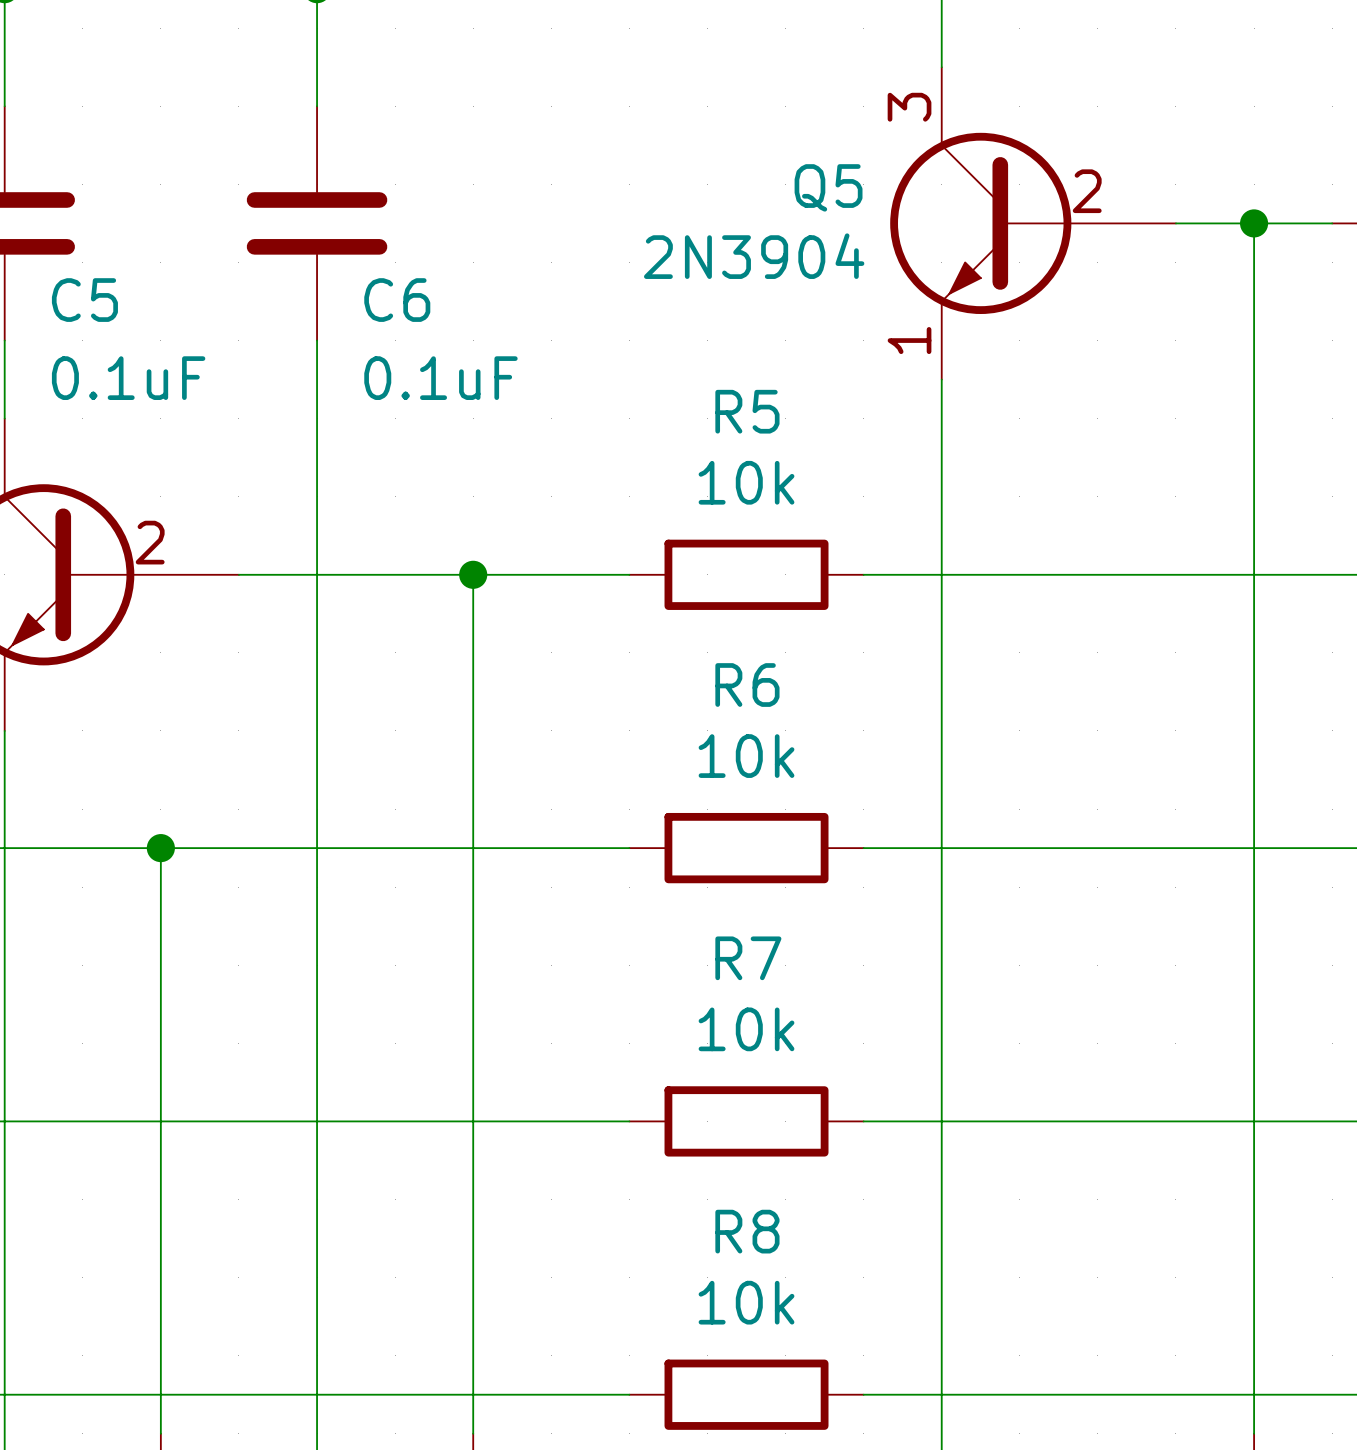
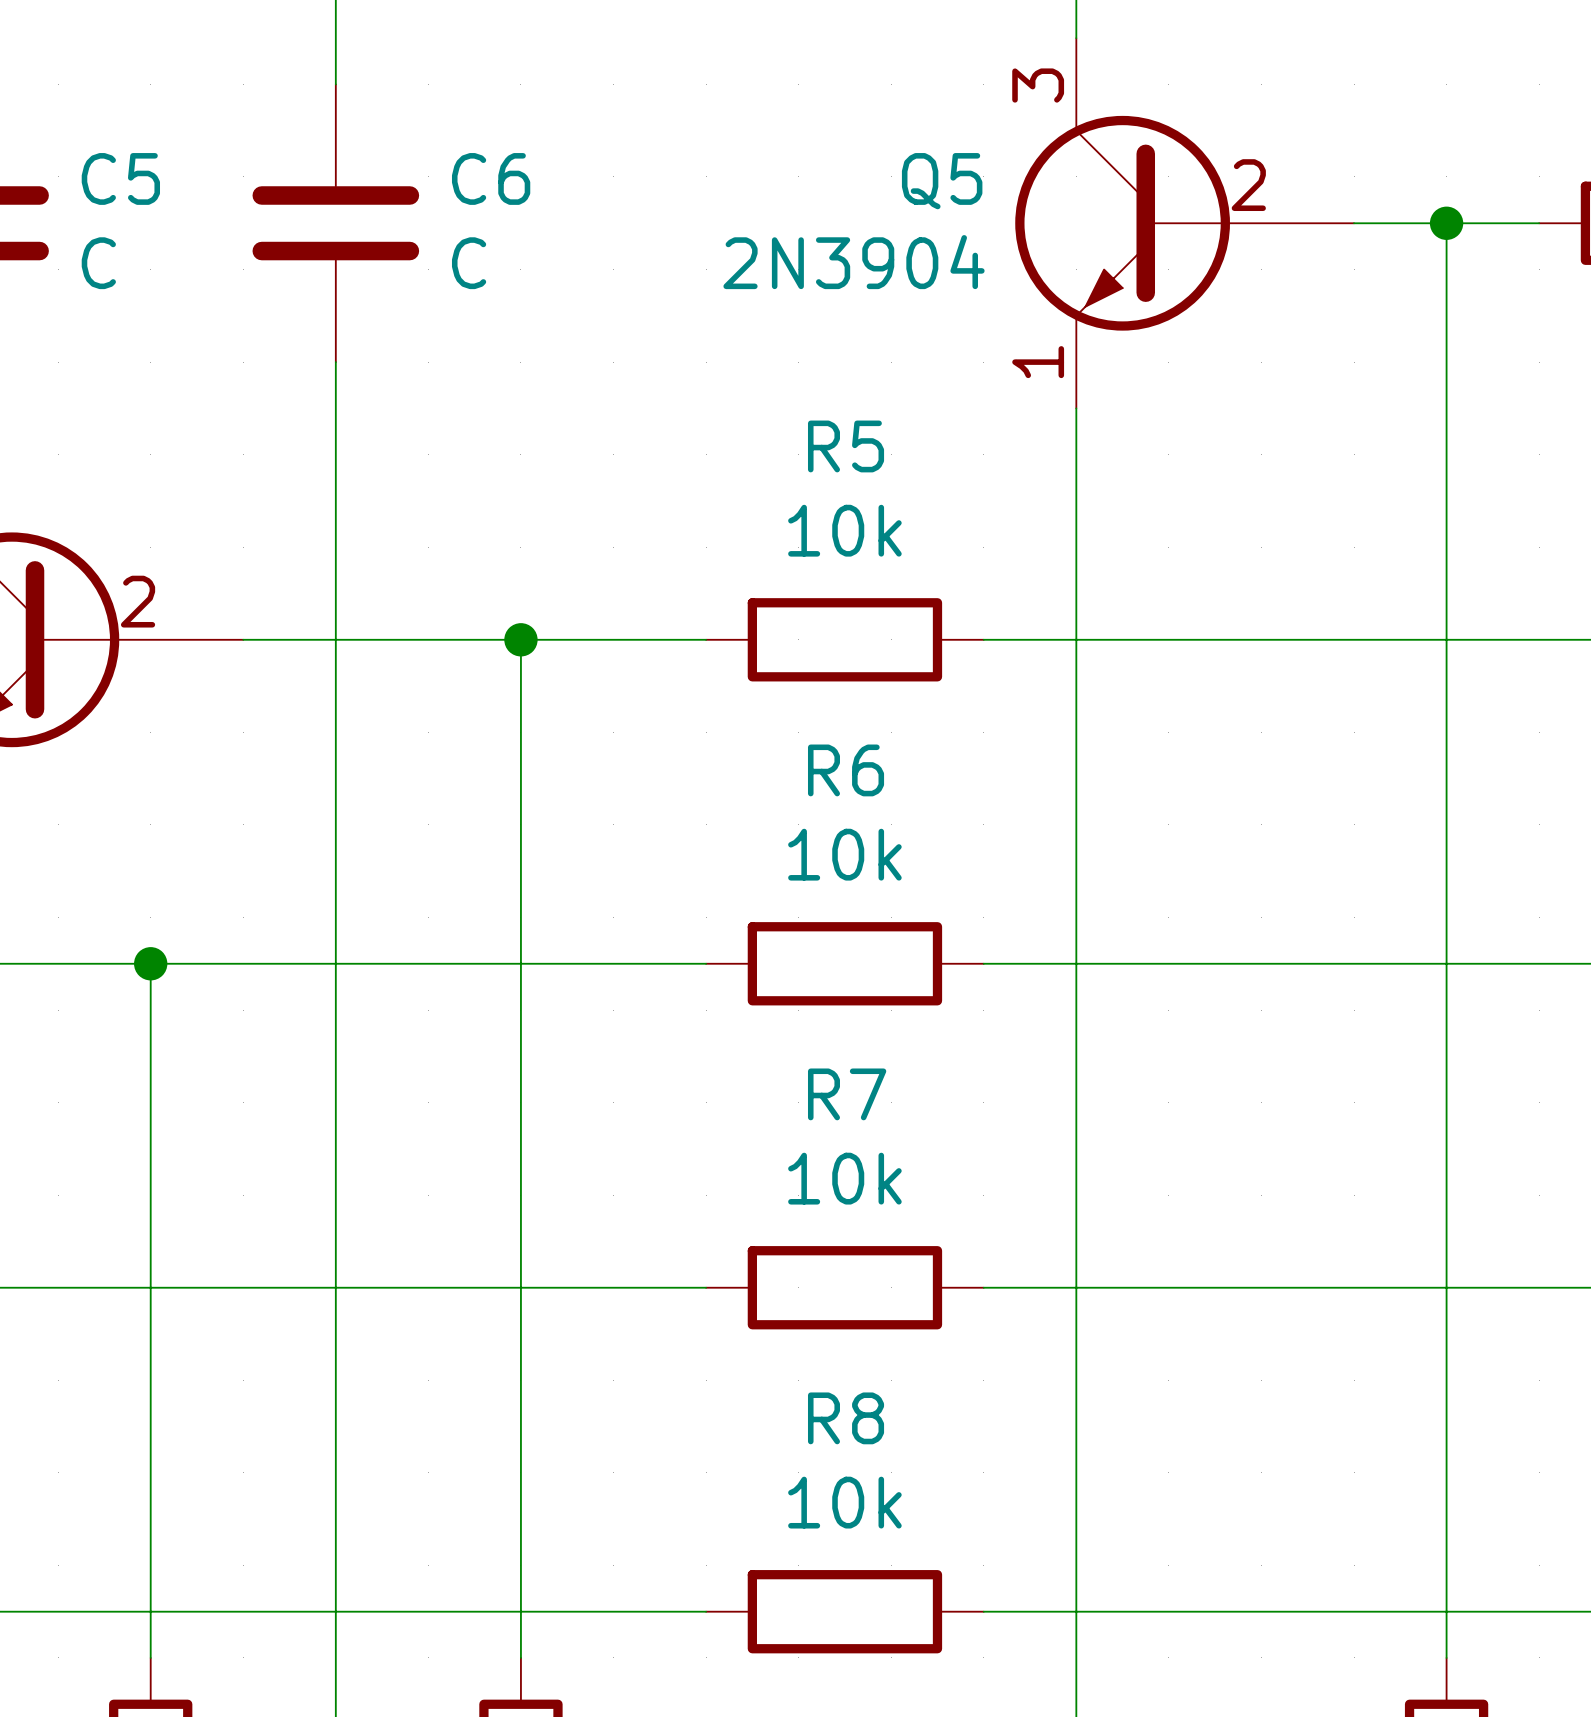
C5 name position: C5 (84, 300) -> C5 (120, 178)
C6 name position: C6 (397, 300) -> C6 (491, 178)
C5 value: 0.1uF (128, 378) -> C (98, 263)
C6 value: 0.1uF (440, 378) -> C (469, 263)

